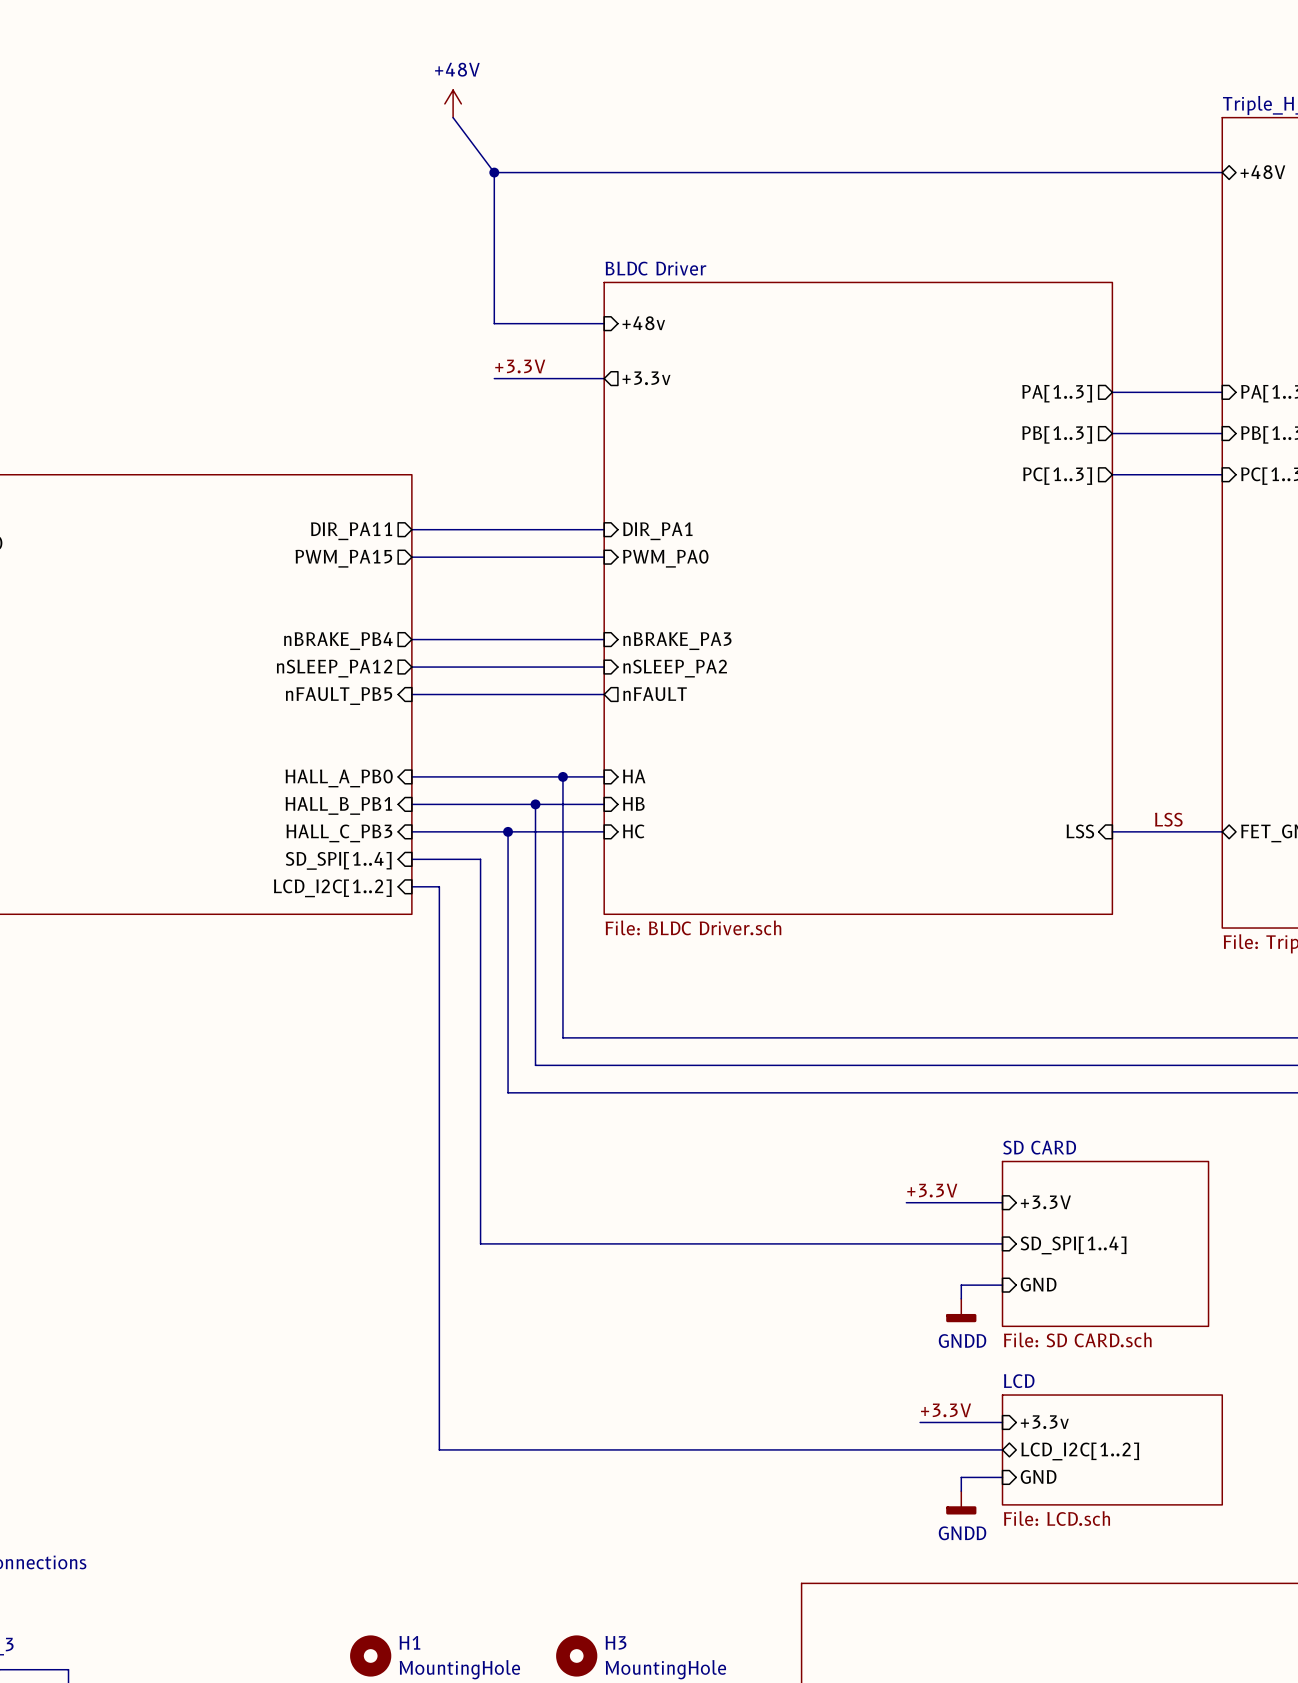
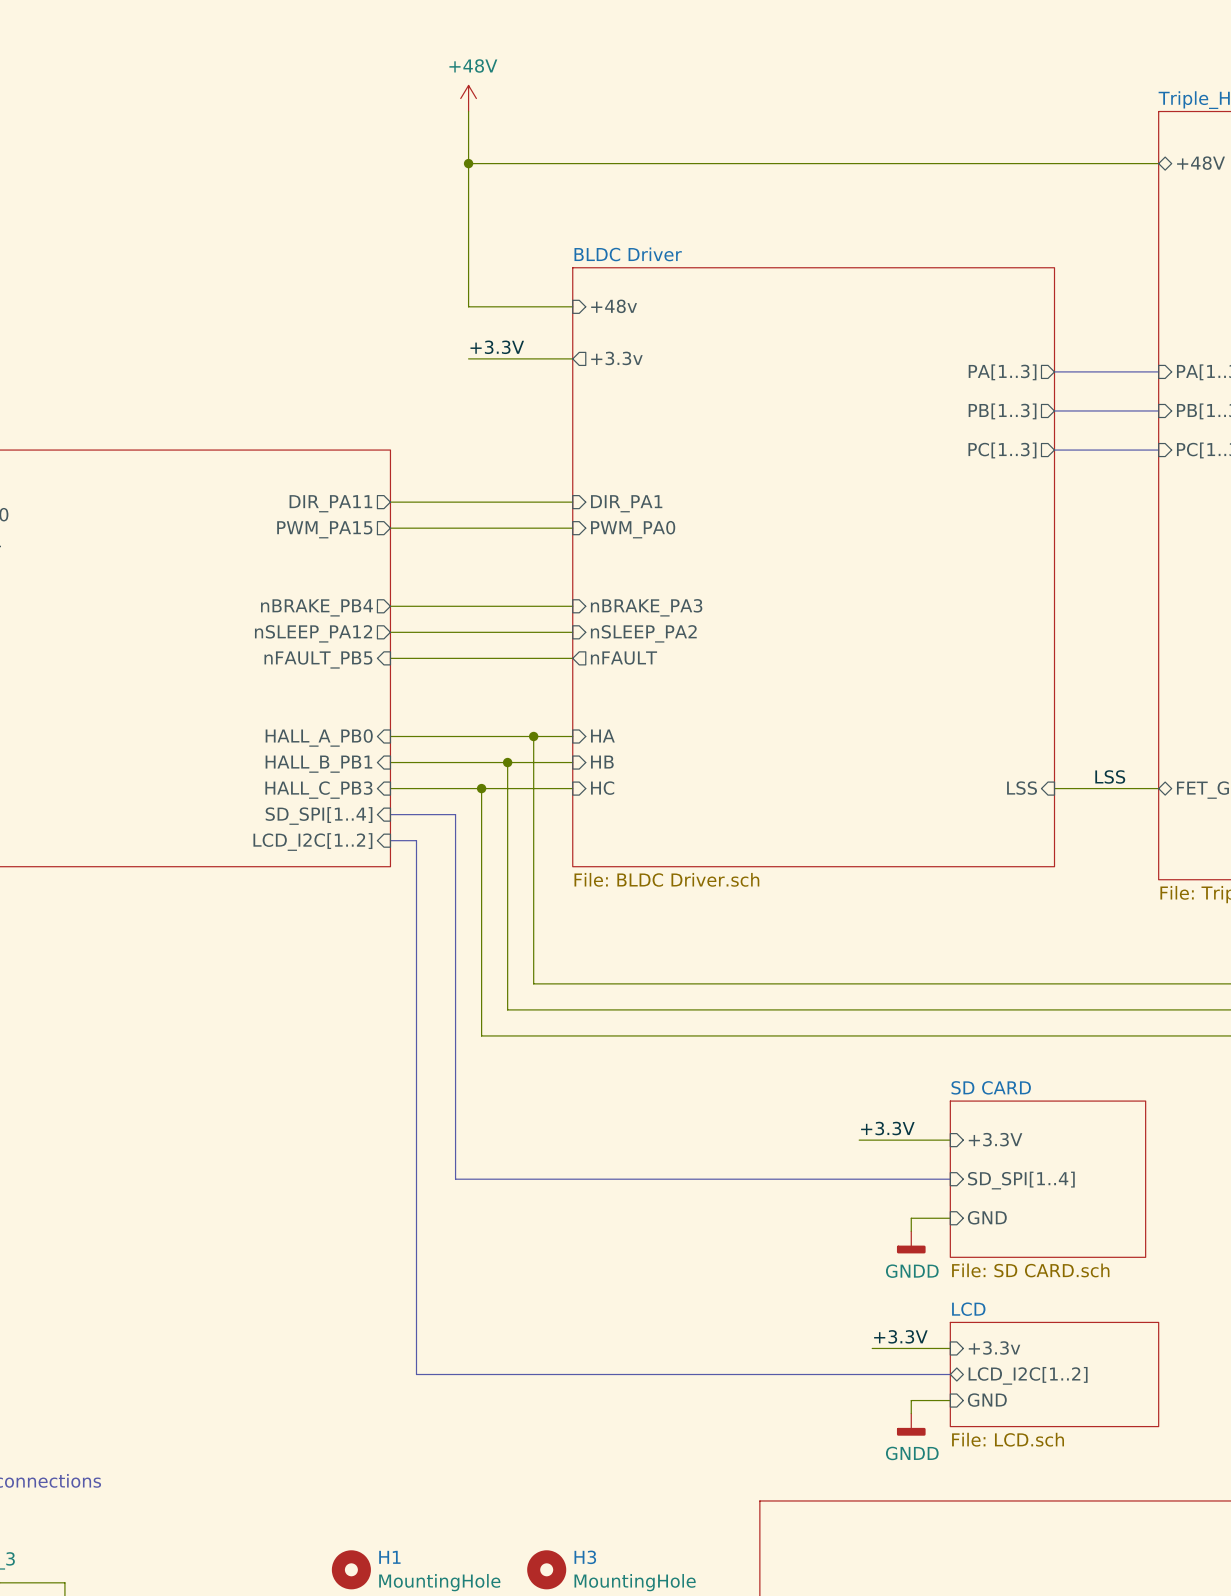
power symbol position: +48V (453, 103) -> +48V (468, 98)
wire: (453, 117) (494, 172) -> (468, 111) (468, 163)

